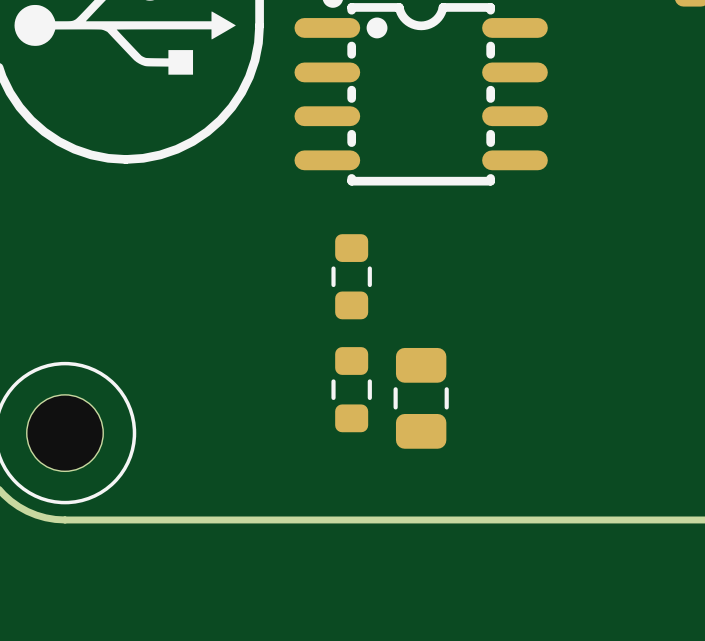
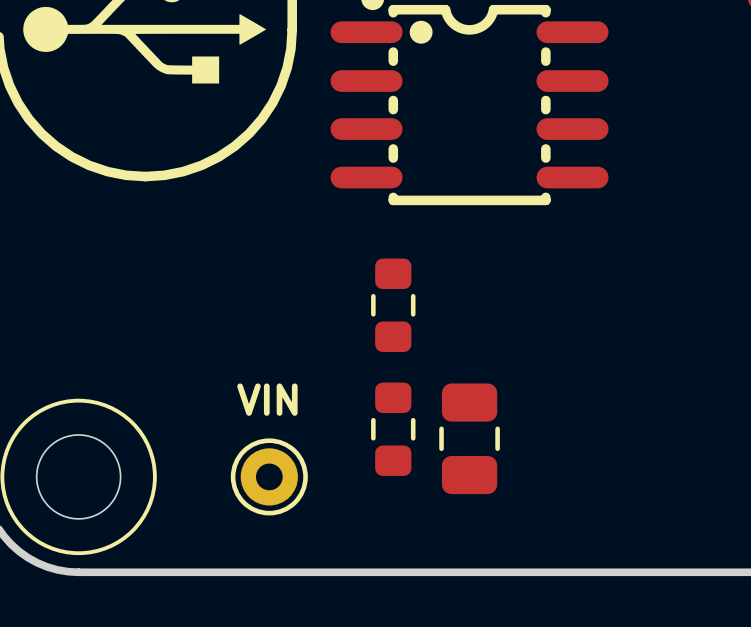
text: none -> VIN (267, 399)
part: none -> (269, 476)

